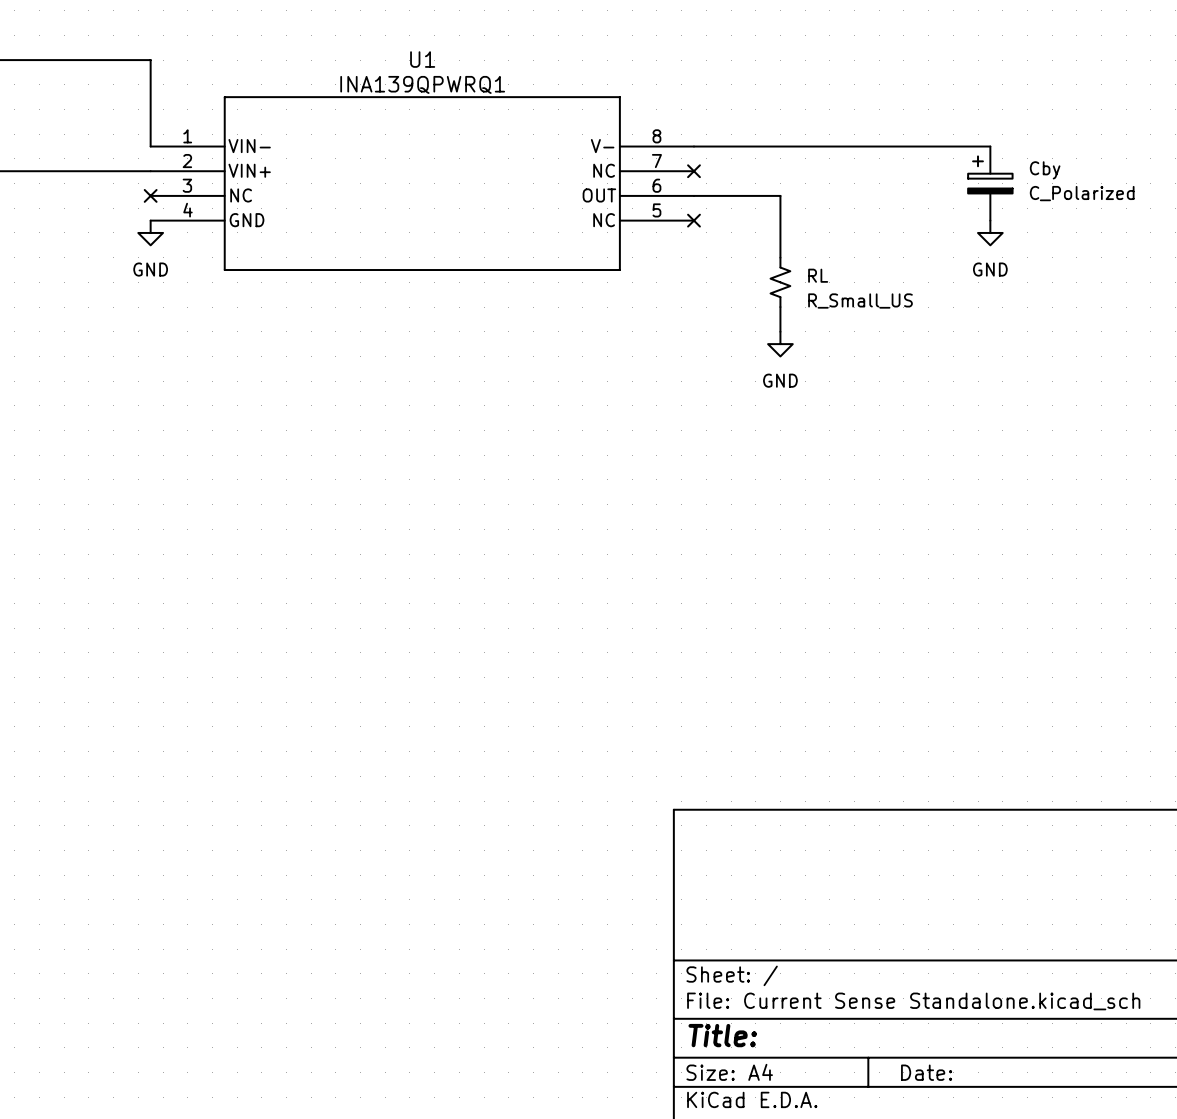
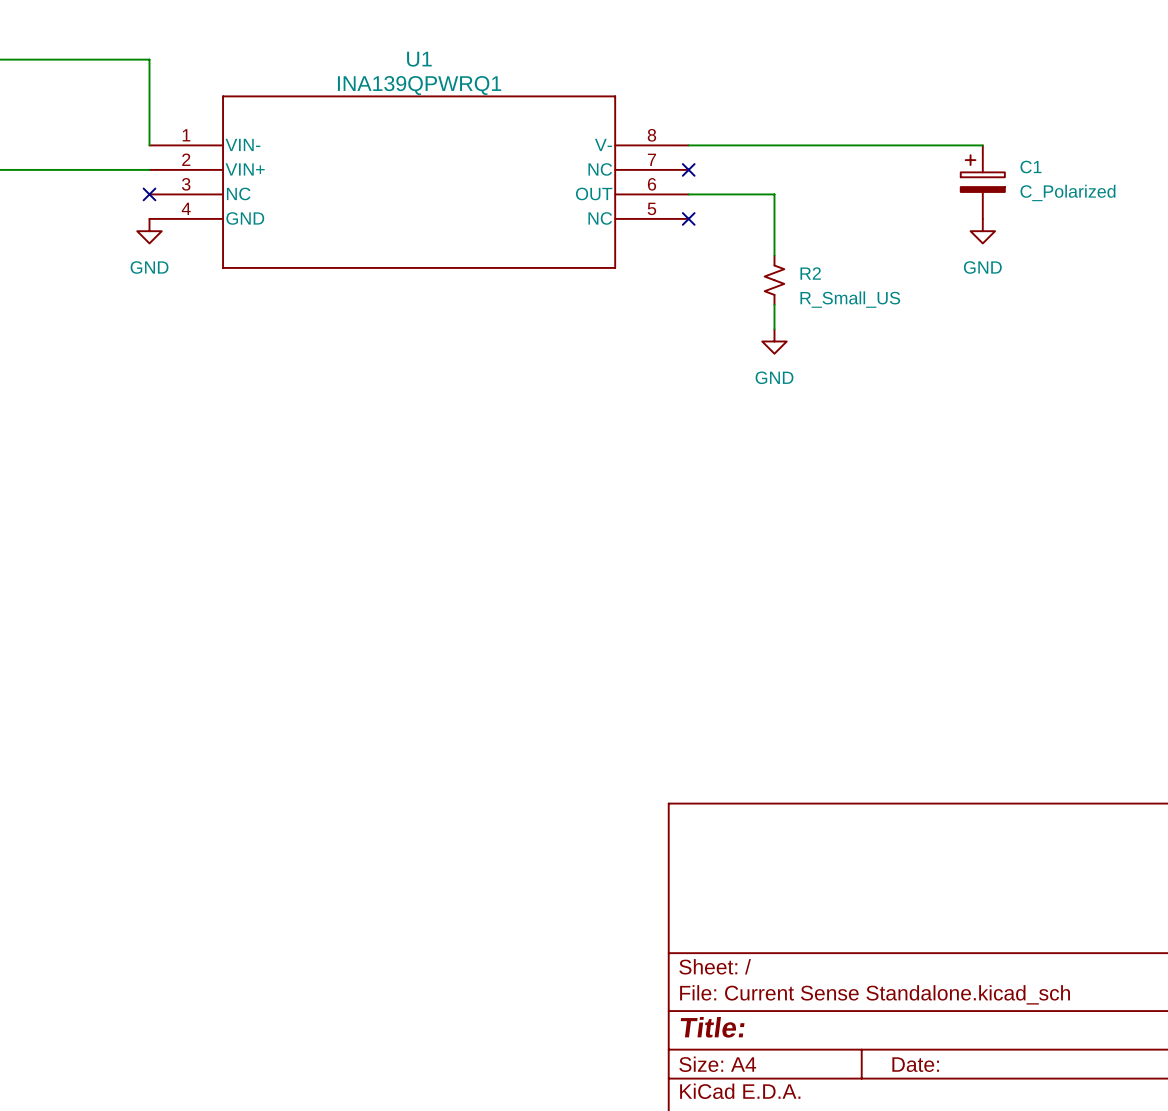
Cby name: Cby (1045, 170) -> C1 (1030, 167)
RL name: RL (818, 275) -> R2 (810, 273)

